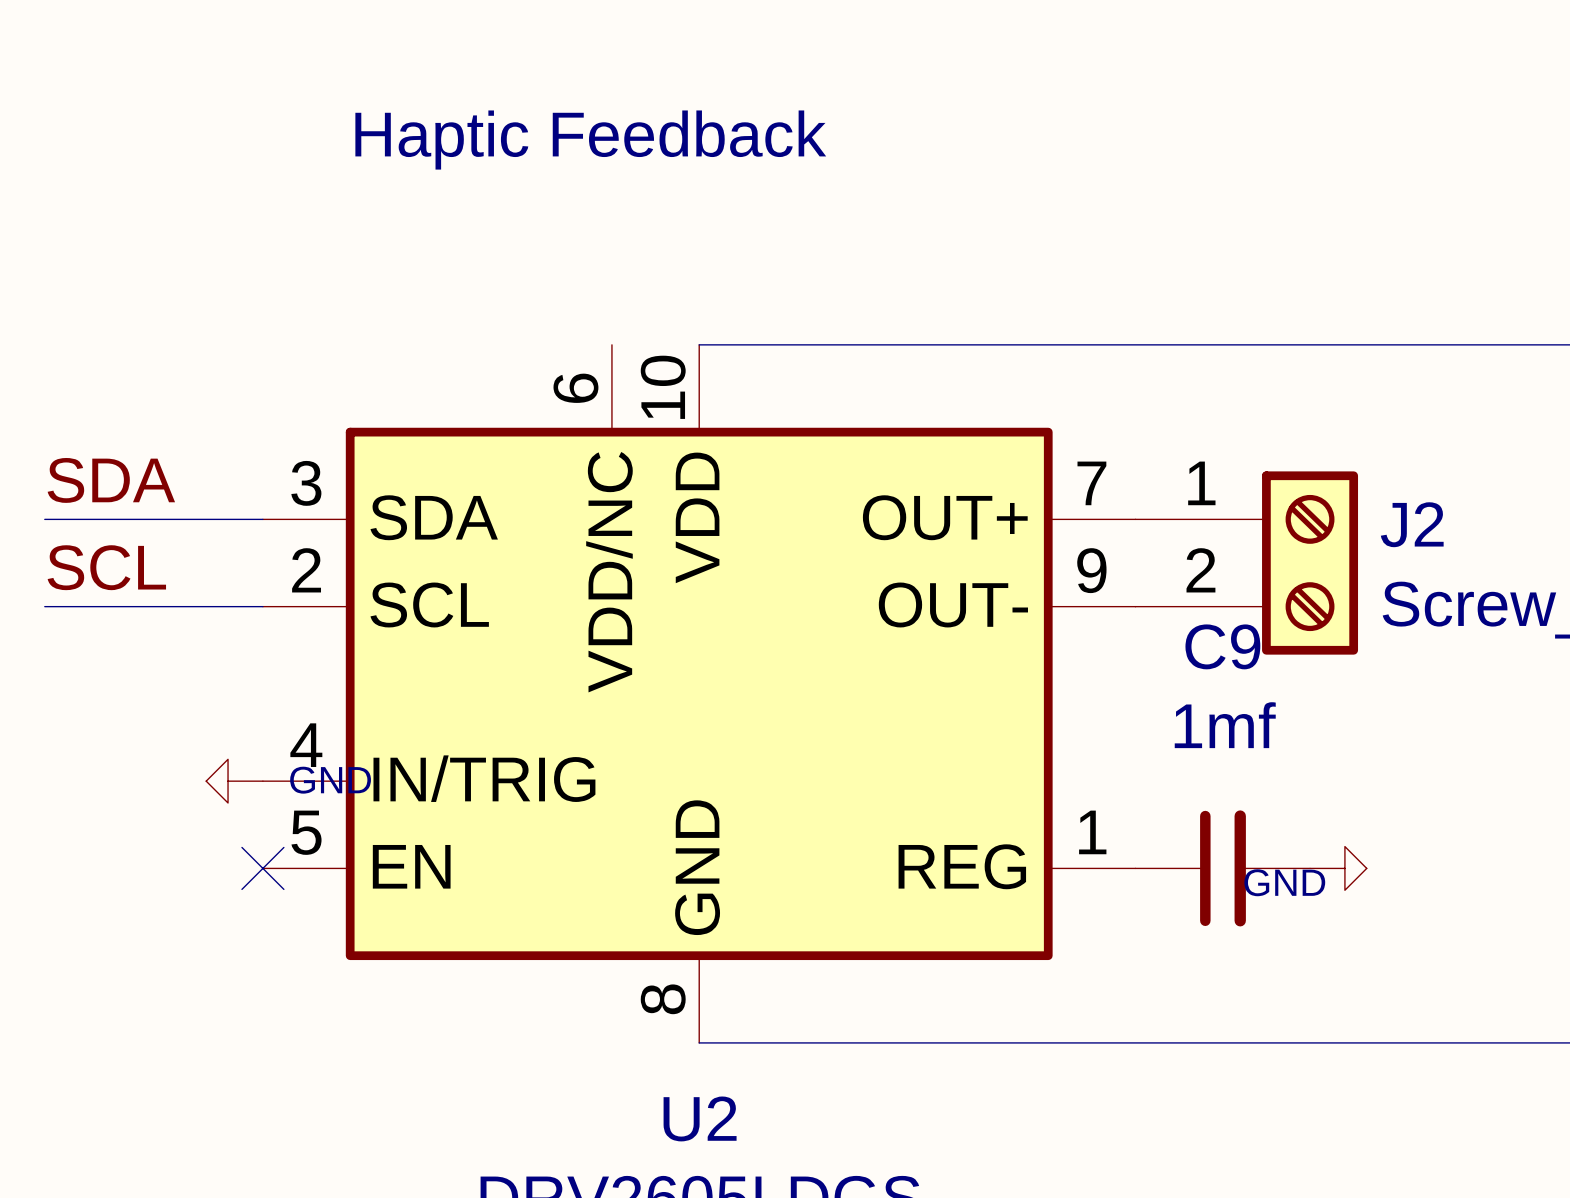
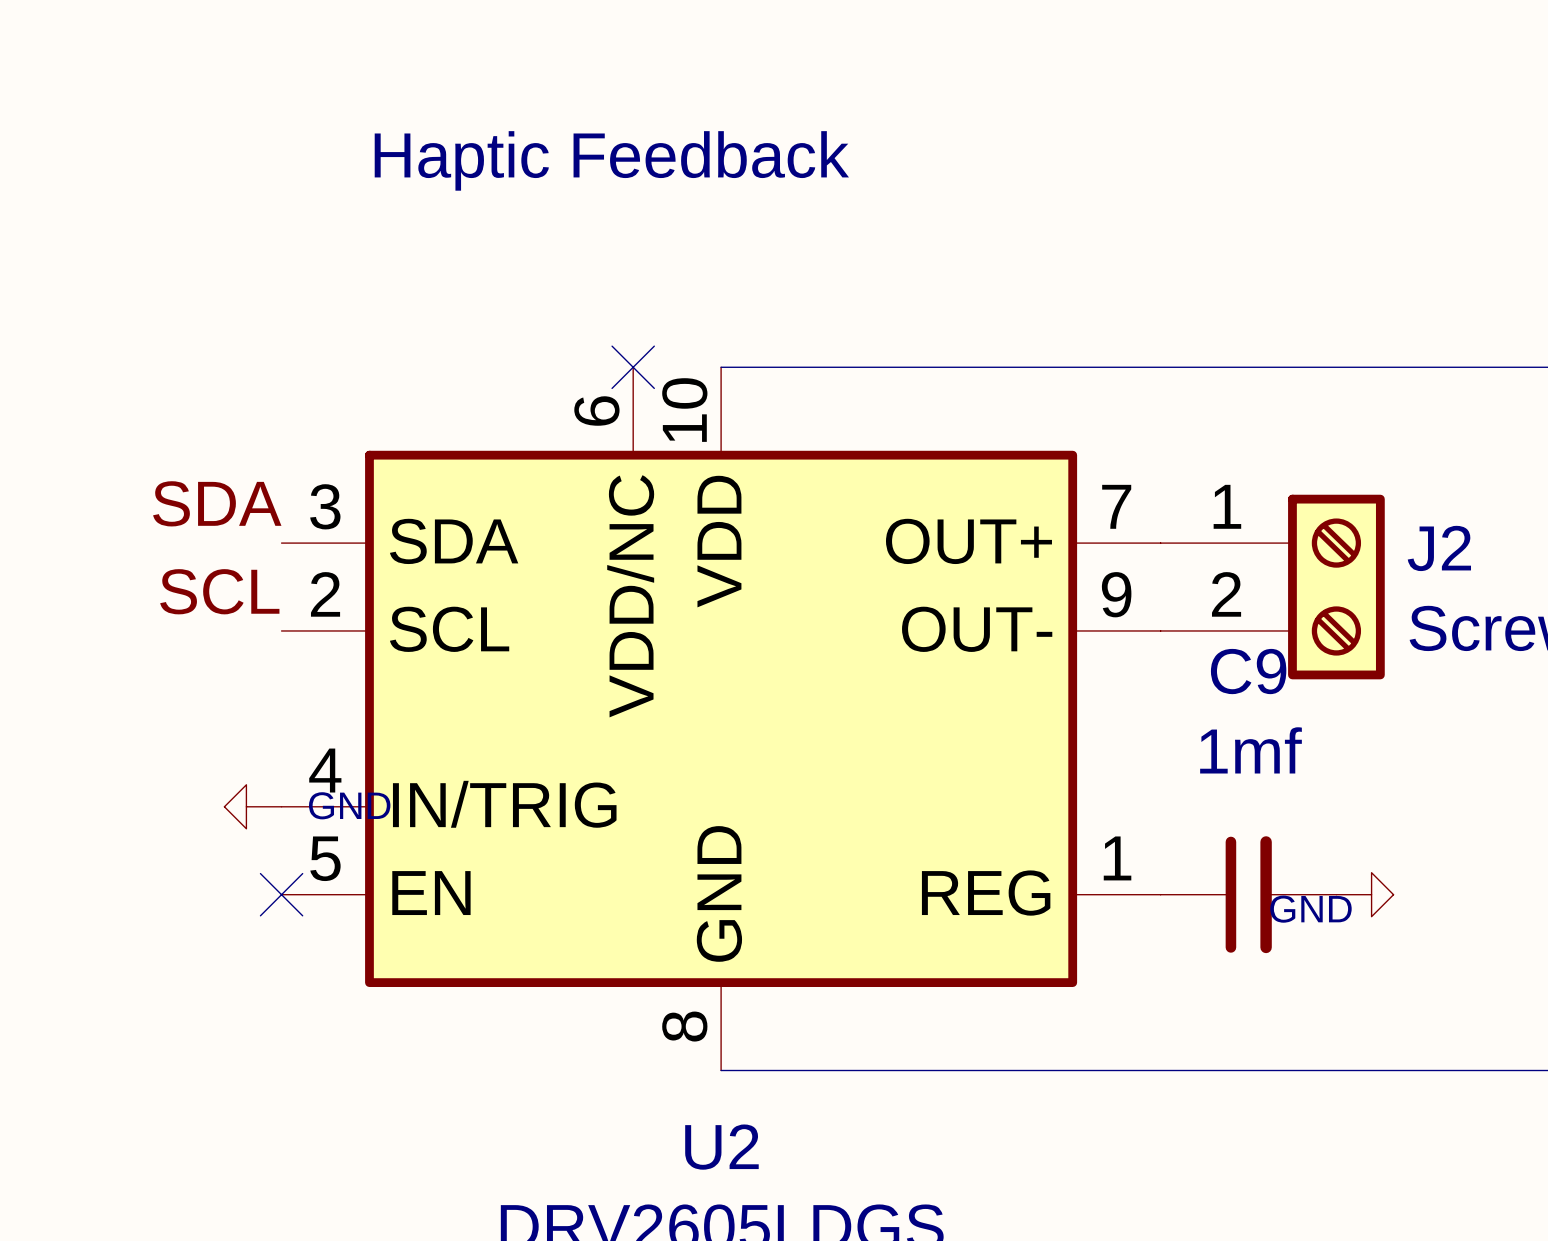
no-connect mark: none -> (633, 367)
label position: SDA (111, 480) -> SDA (217, 503)
wire: (44, 519) (262, 519) -> none
label position: SCL (106, 567) -> SCL (219, 591)
wire: (44, 606) (262, 606) -> none

